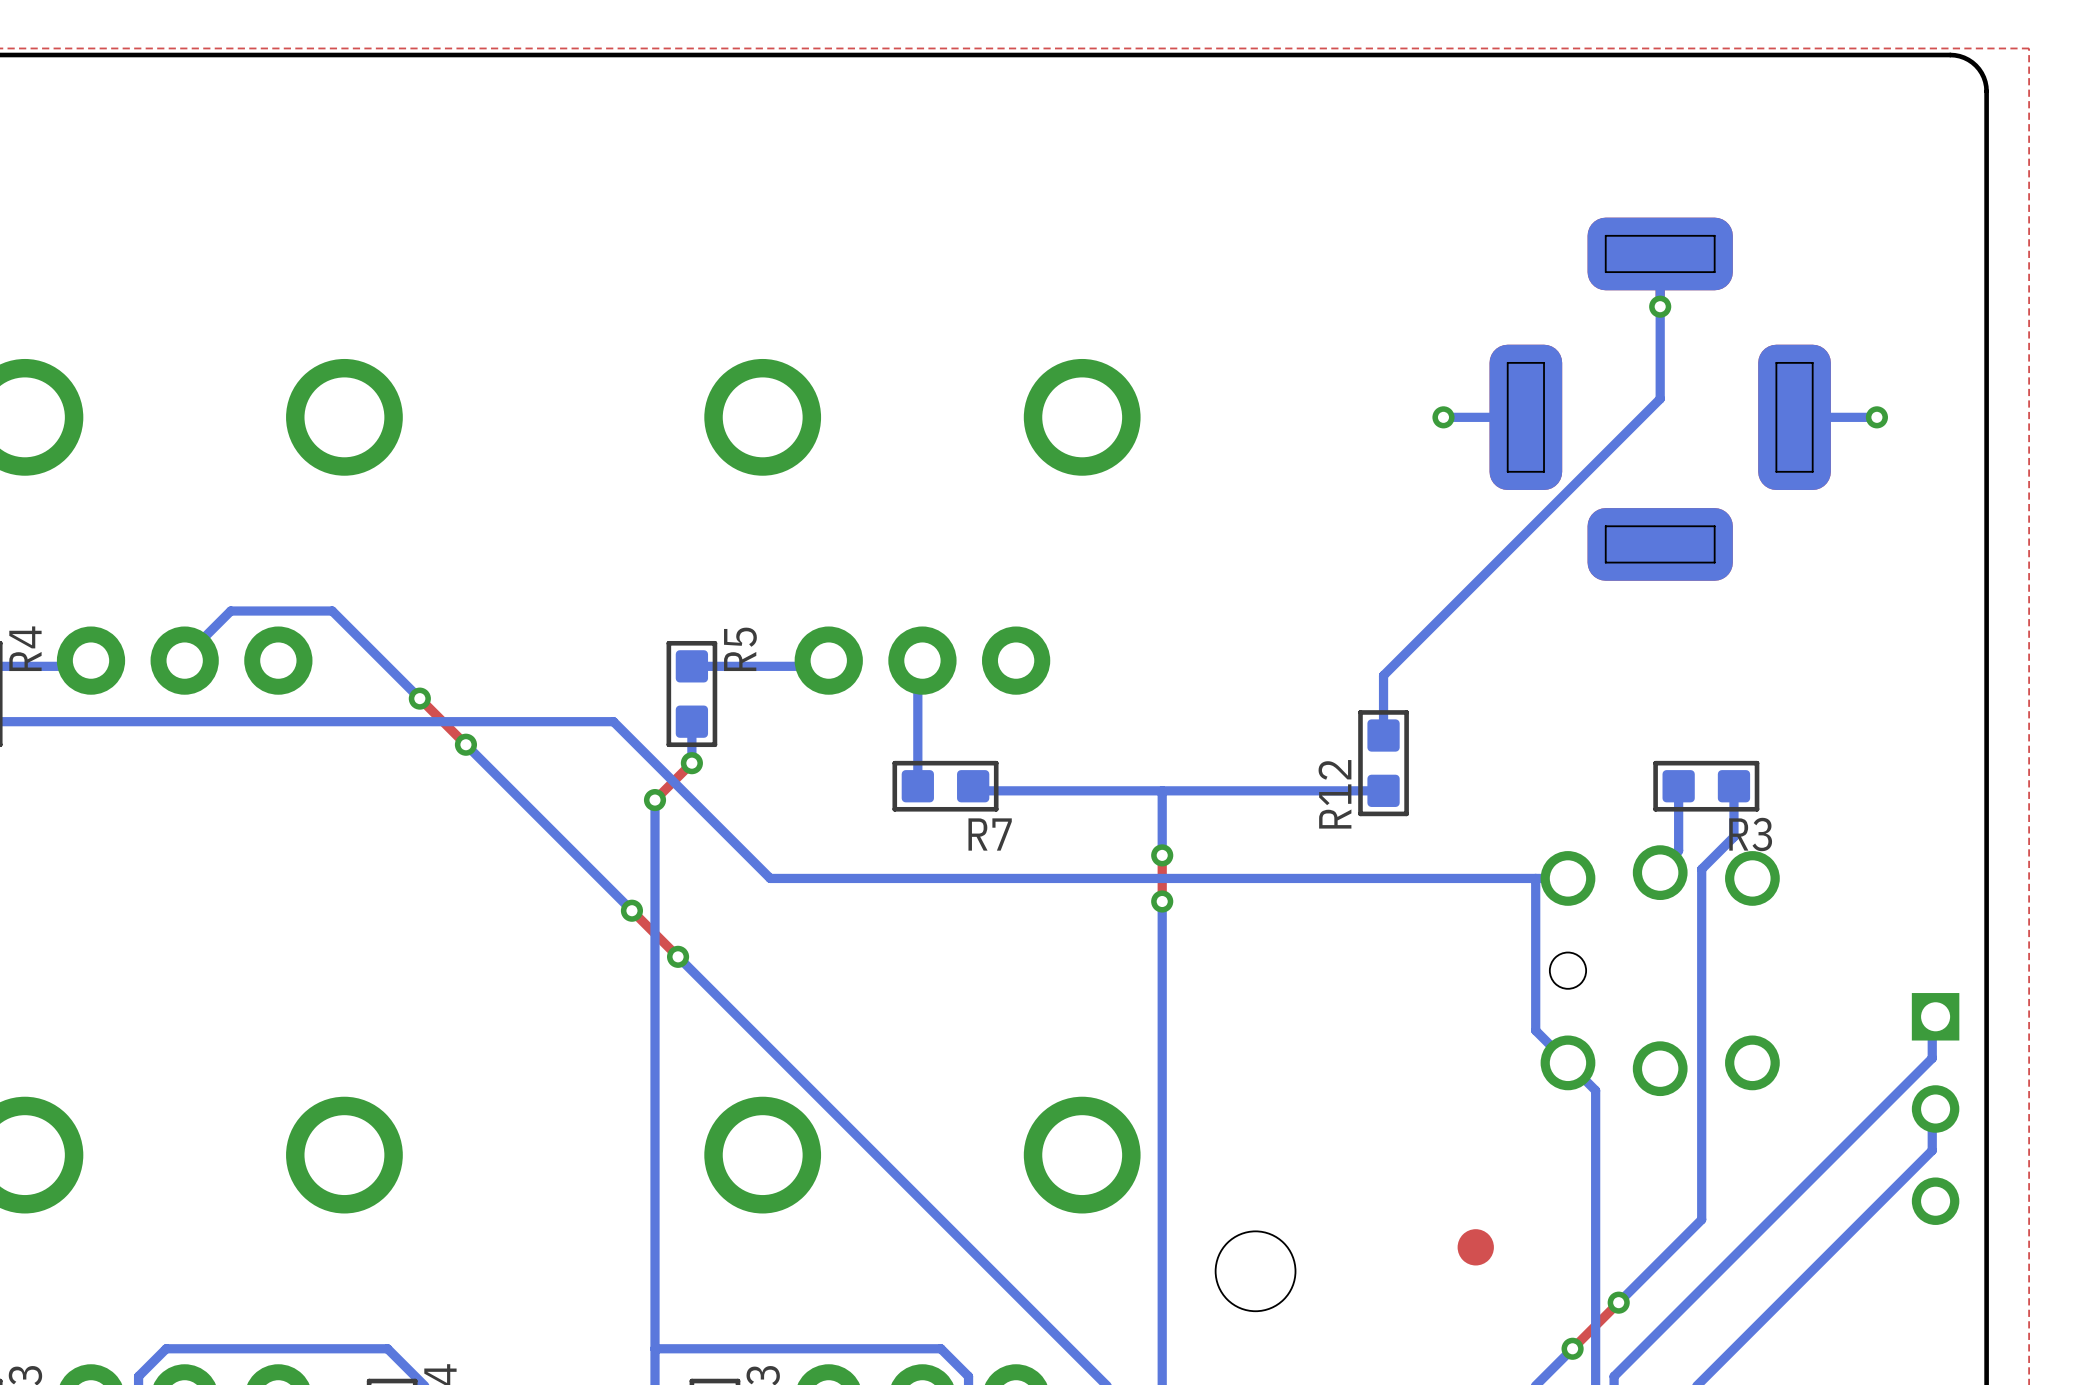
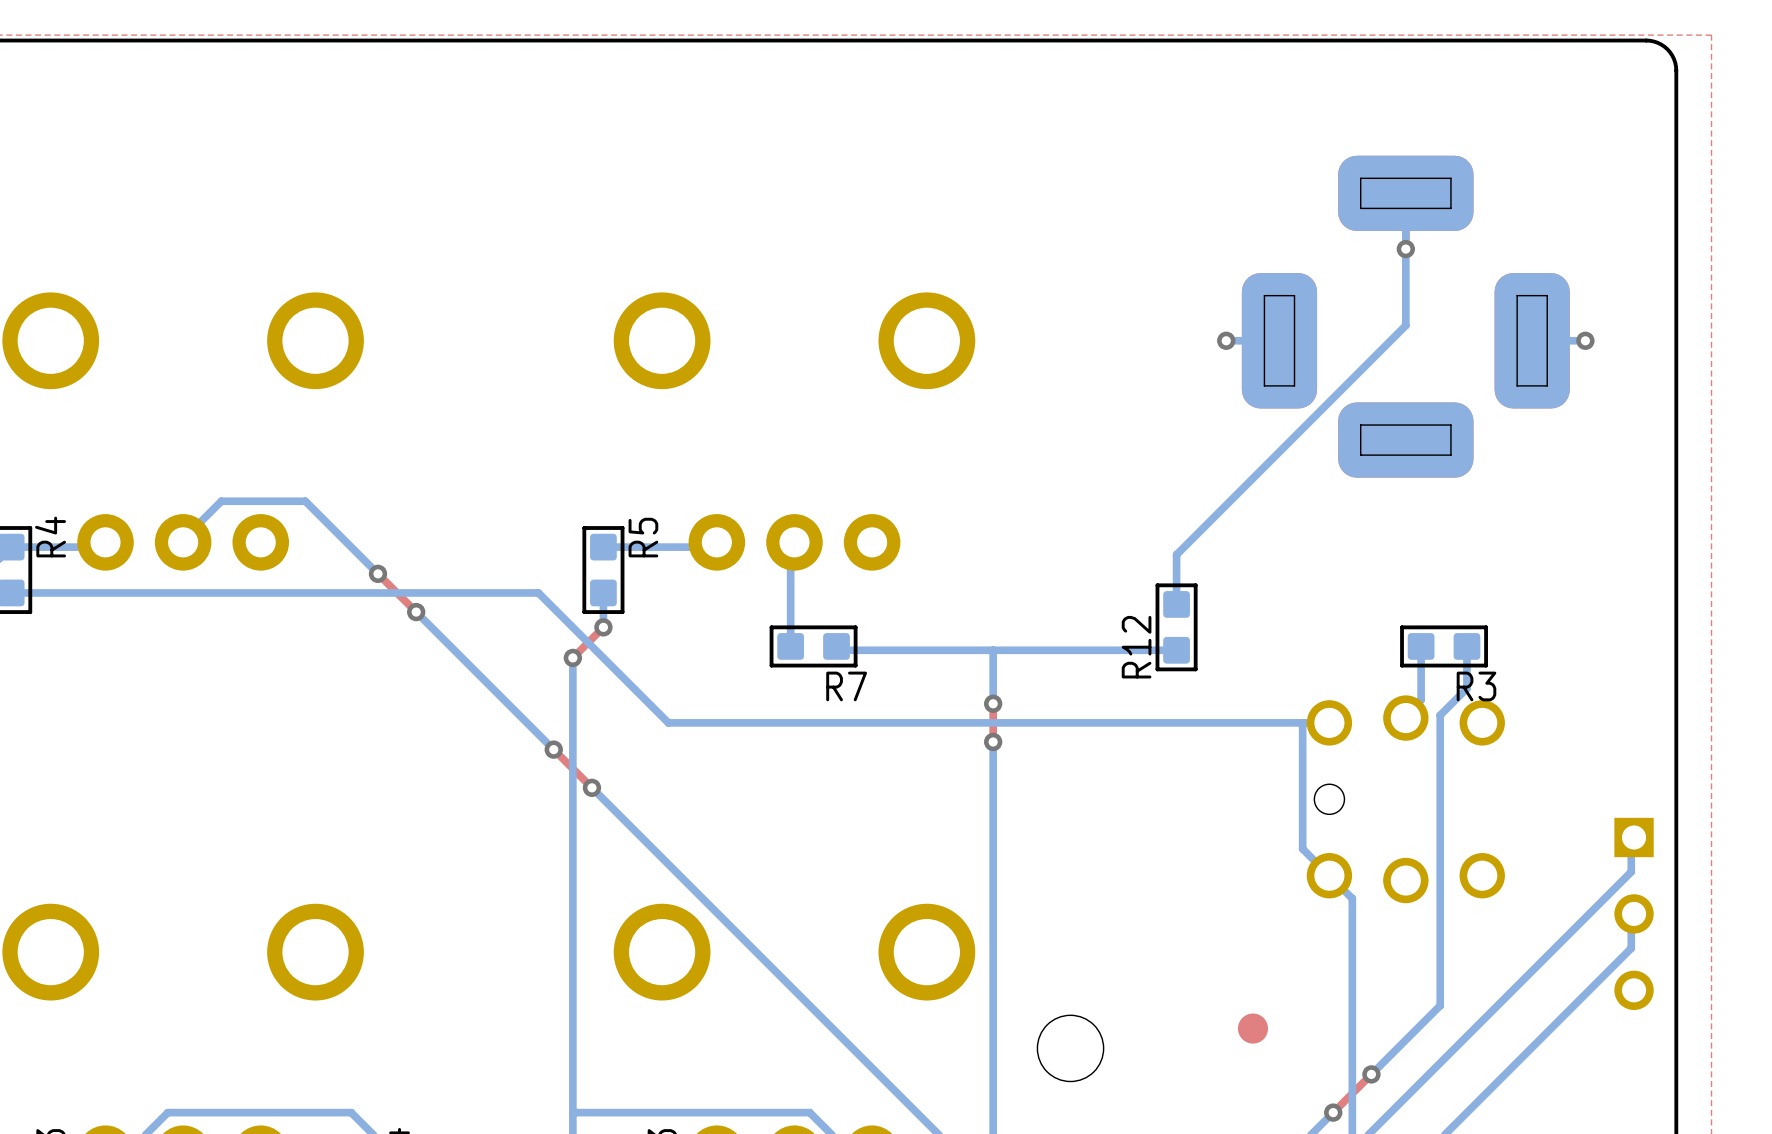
part footprint: [1489, 217, 1831, 581] -> [1241, 155, 1570, 478]

